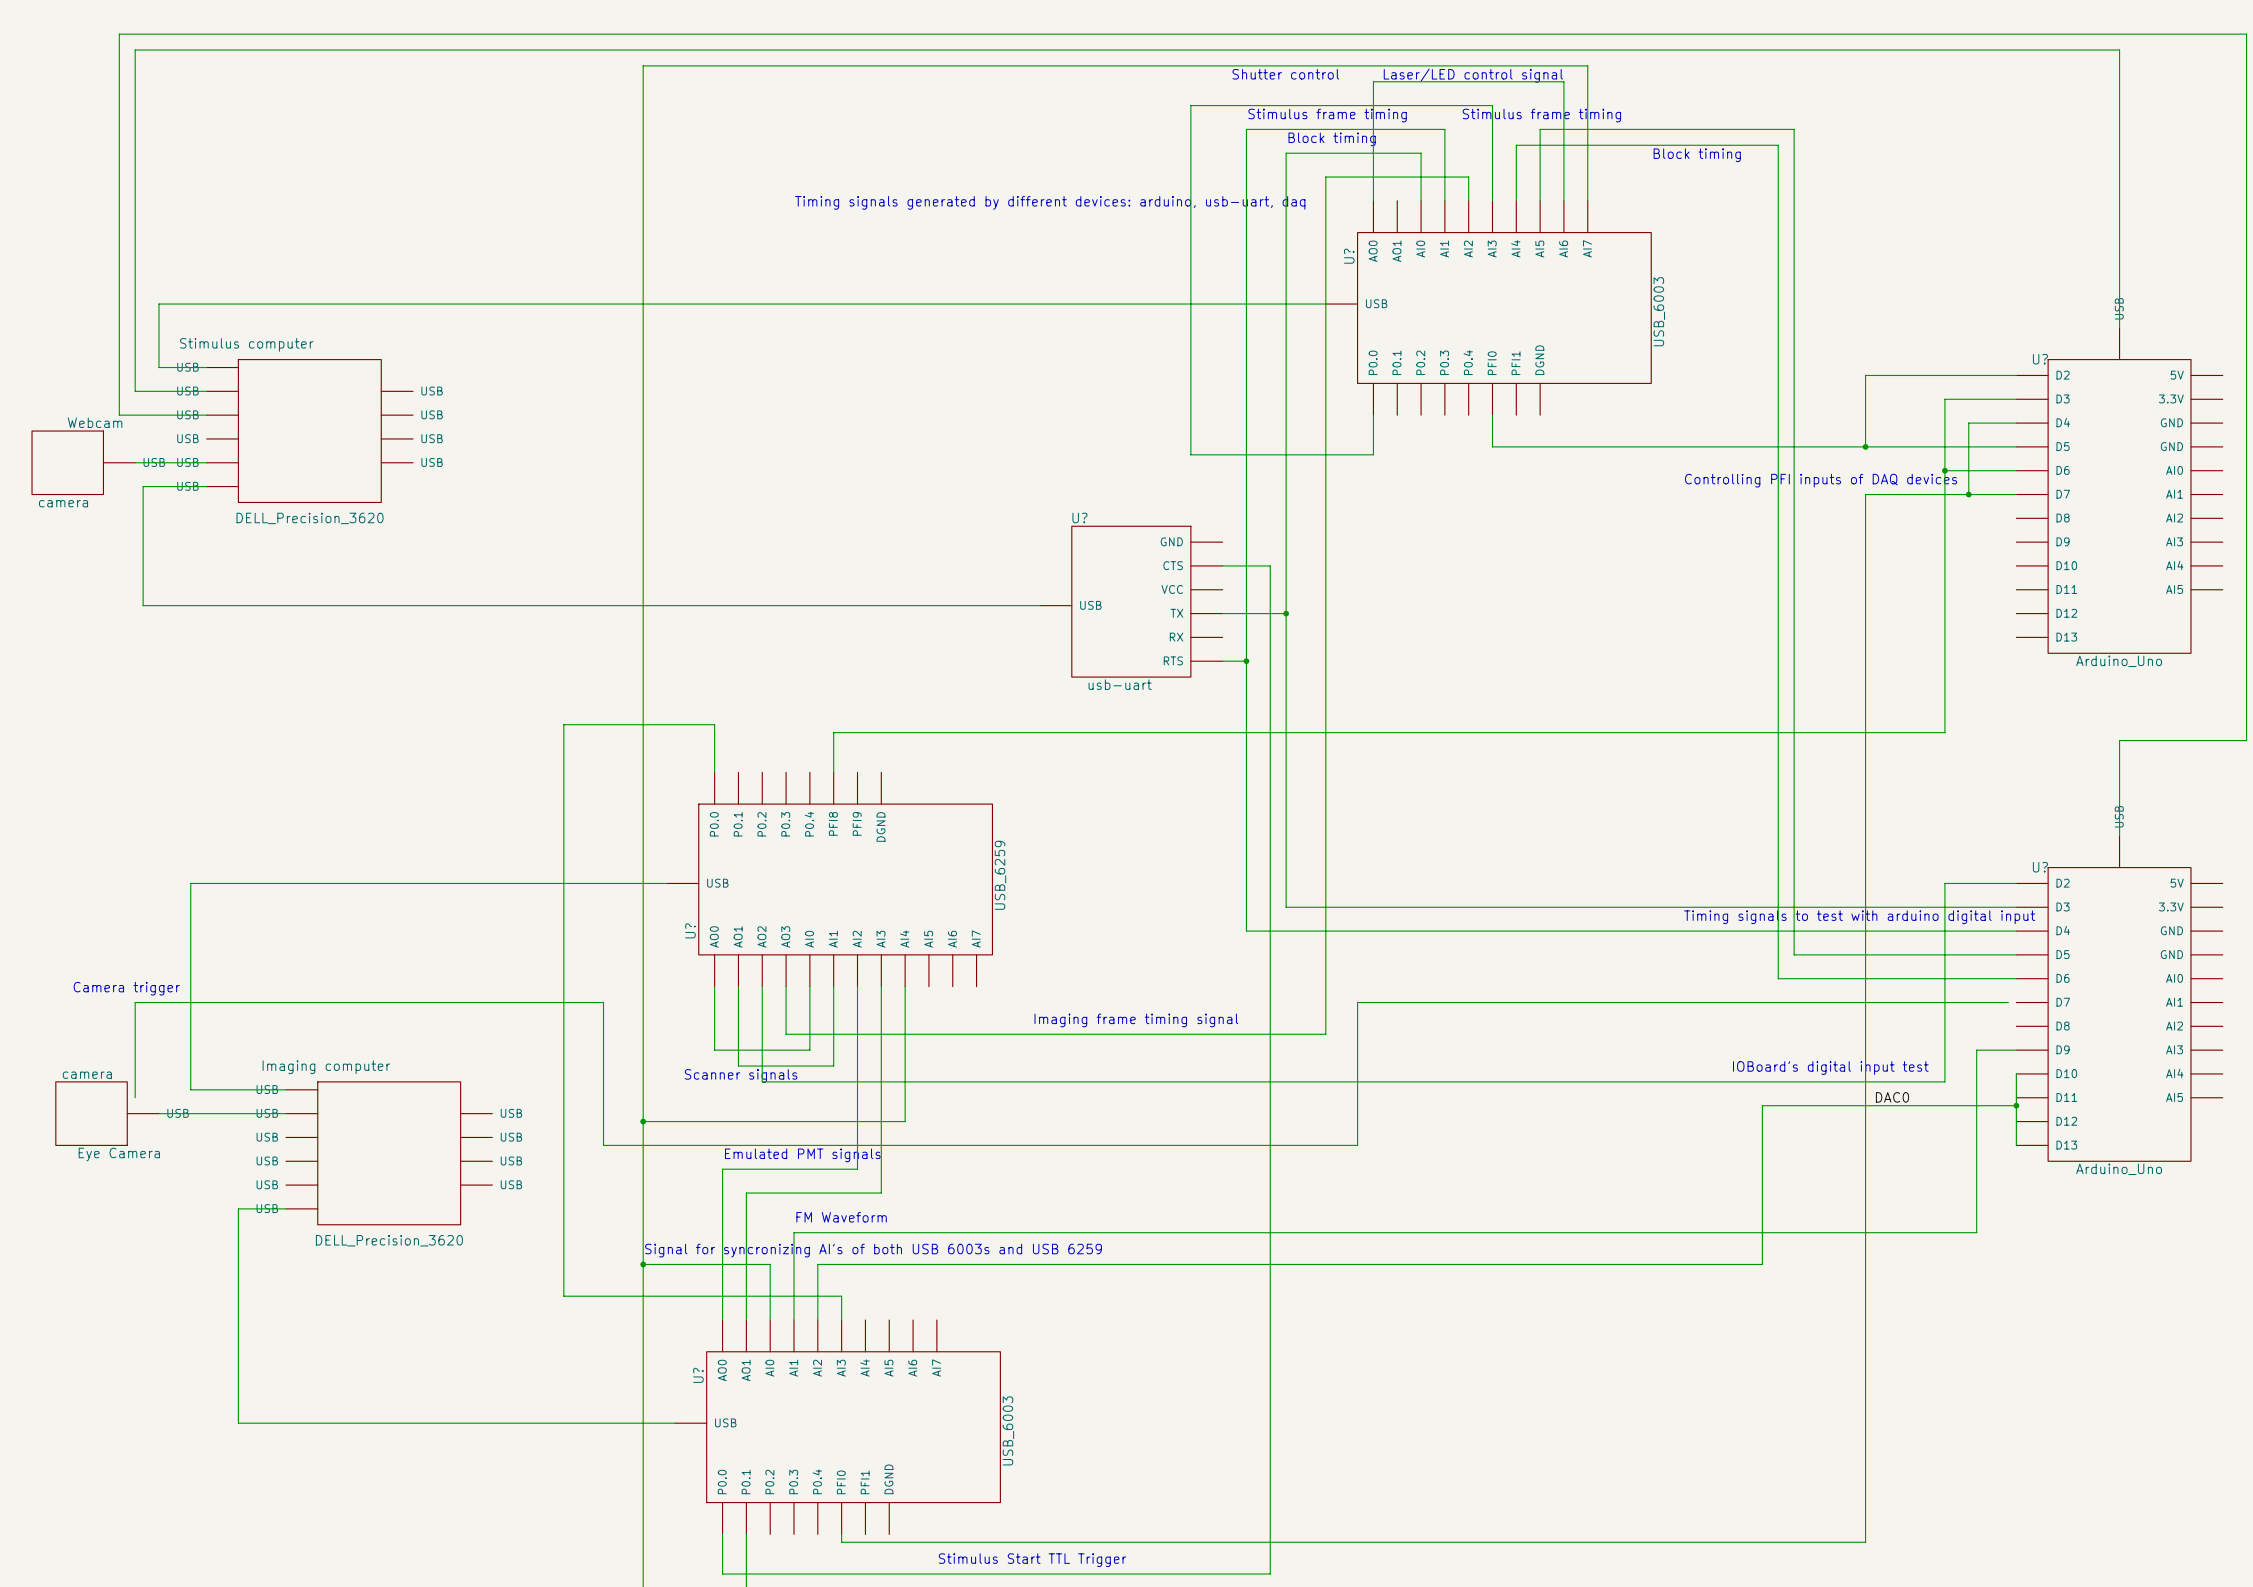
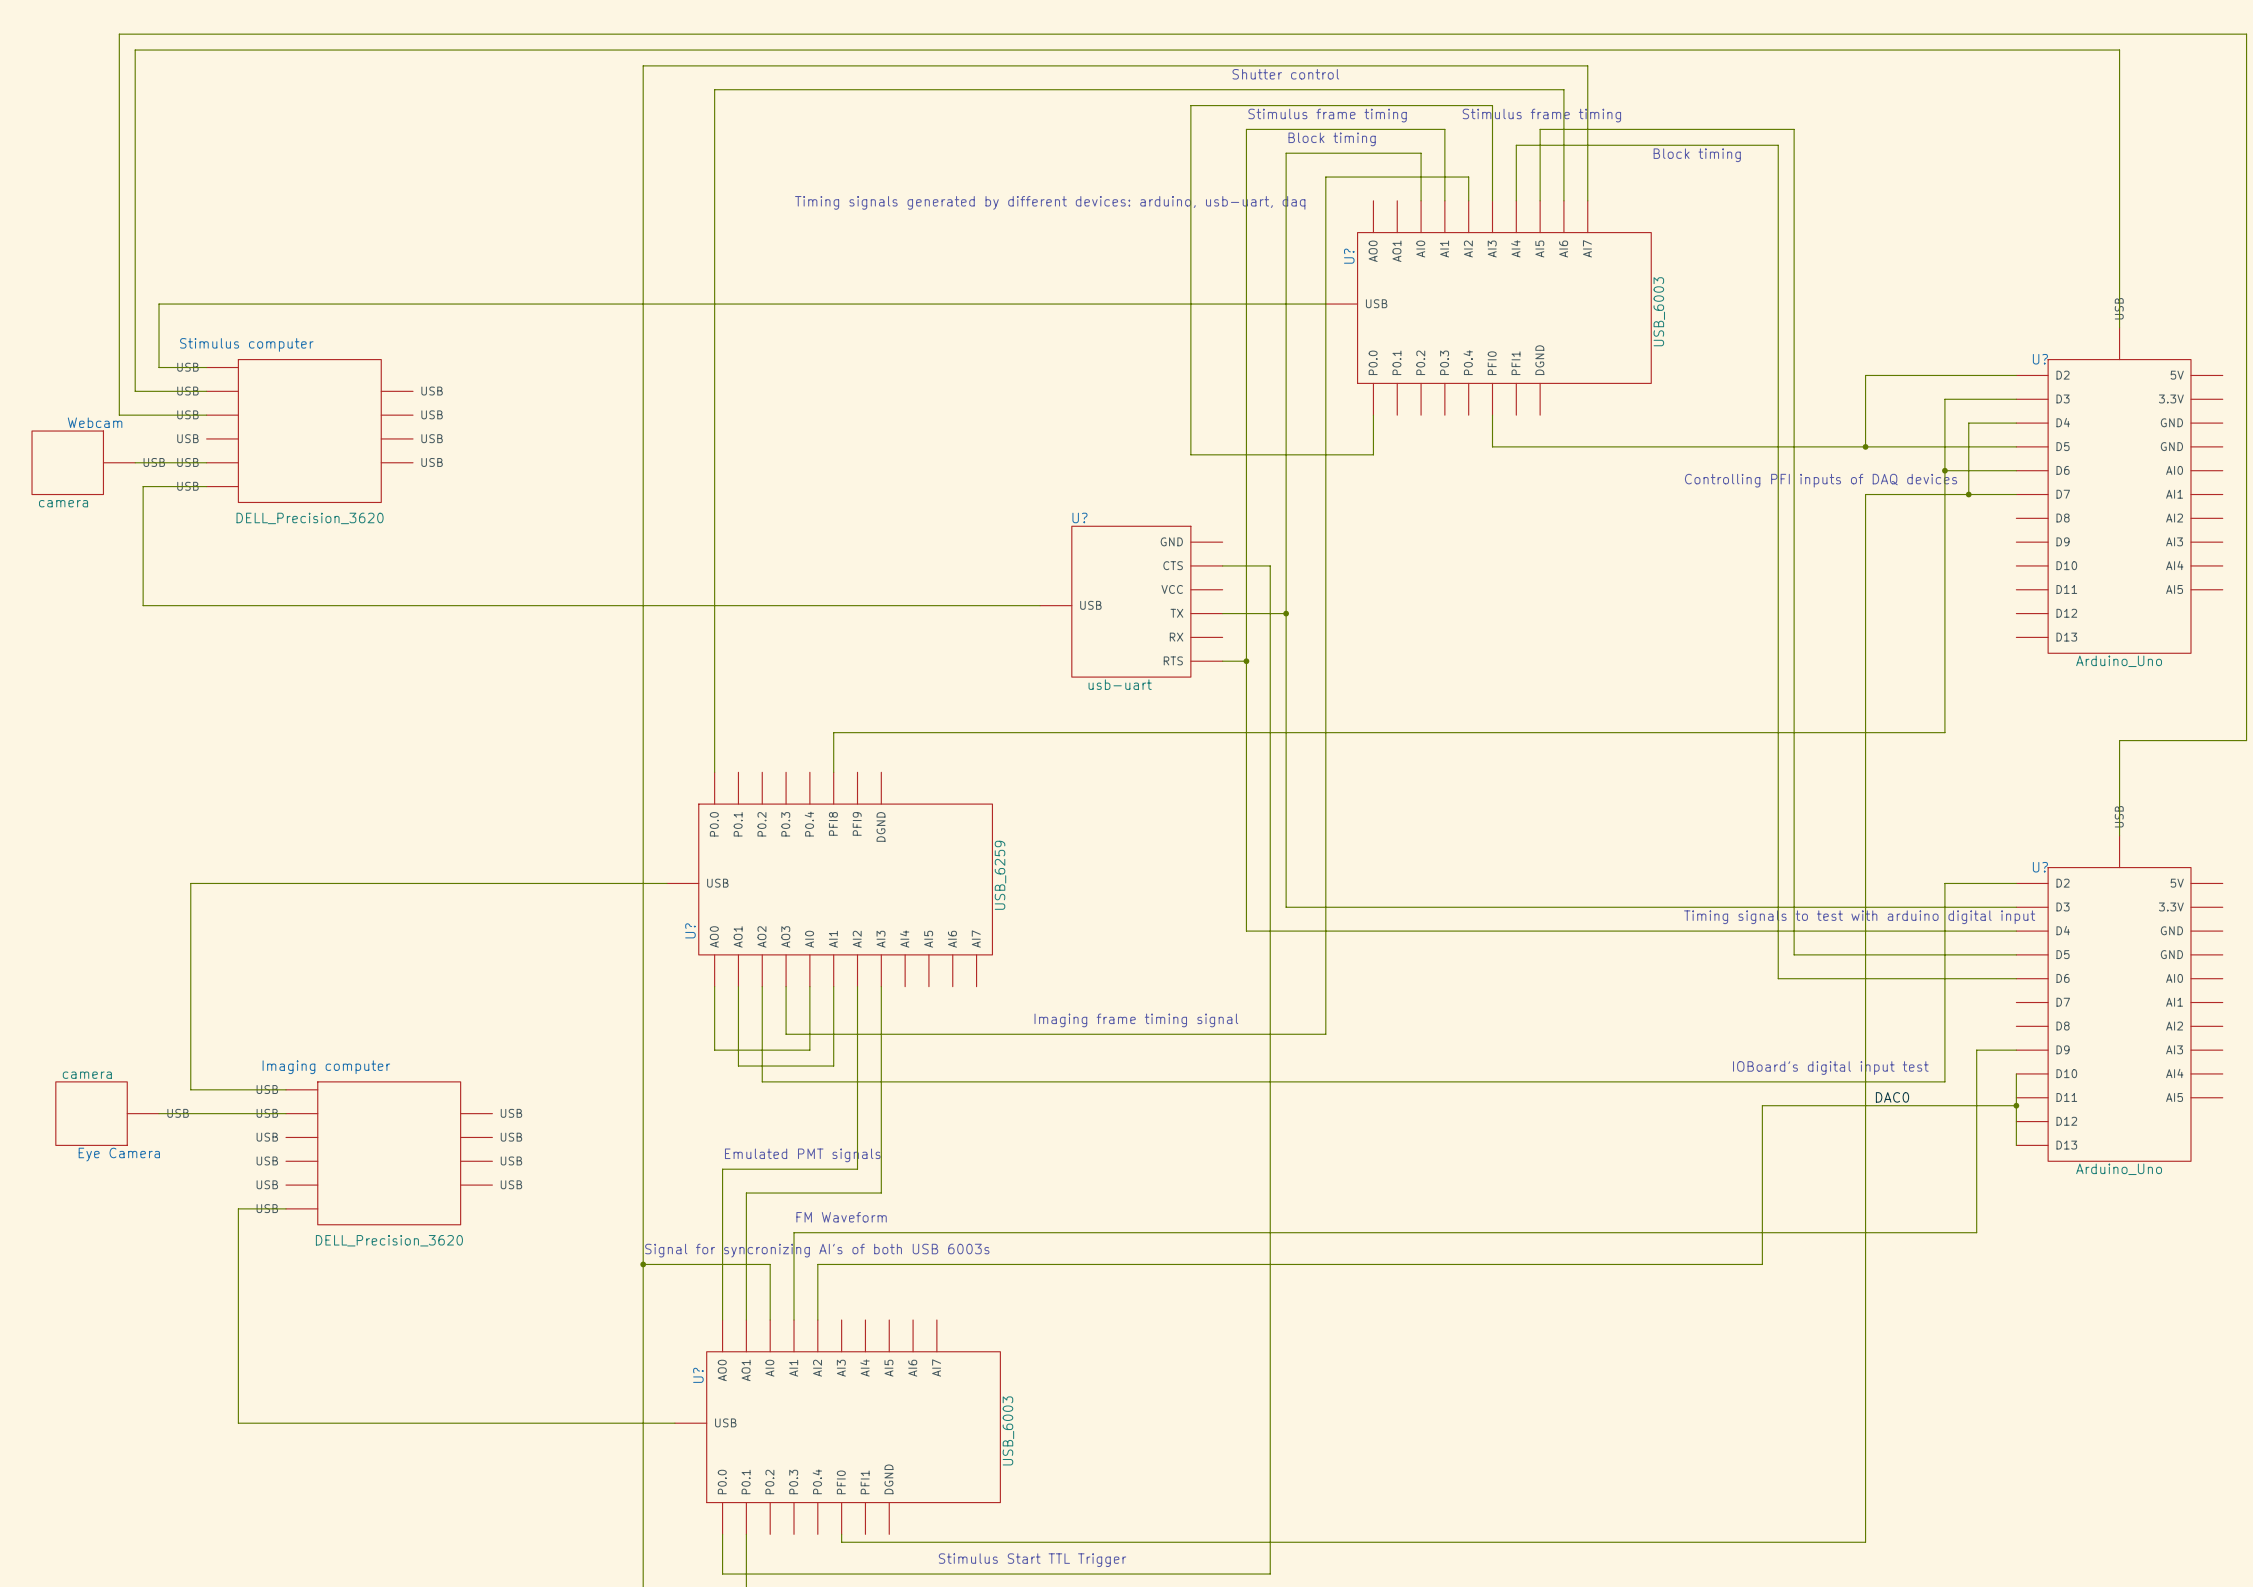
text: Laser/LED control signal (1473, 75) -> none
wire: (1563, 89) (1563, 81) (1373, 81) (1373, 200) -> (1563, 89) (714, 89) (714, 724)
wire: (714, 724) (563, 724) (563, 1296) (841, 1296) (841, 1320) -> none
wire: (905, 986) (905, 1121) (643, 1121) -> none
text: Camera trigger (126, 988) -> none
wire: (2008, 1002) (1357, 1002) (1357, 1145) (603, 1145) (603, 1002) (135, 1002) (135, 1097) -> none
text: Scanner signals (741, 1075) -> none
junction: (643, 1121) -> none
text: Signal for syncronizing AI's of both USB 6003s and USB 6259 (873, 1250) -> Signal for syncronizing AI's of both USB 6003s (817, 1250)

